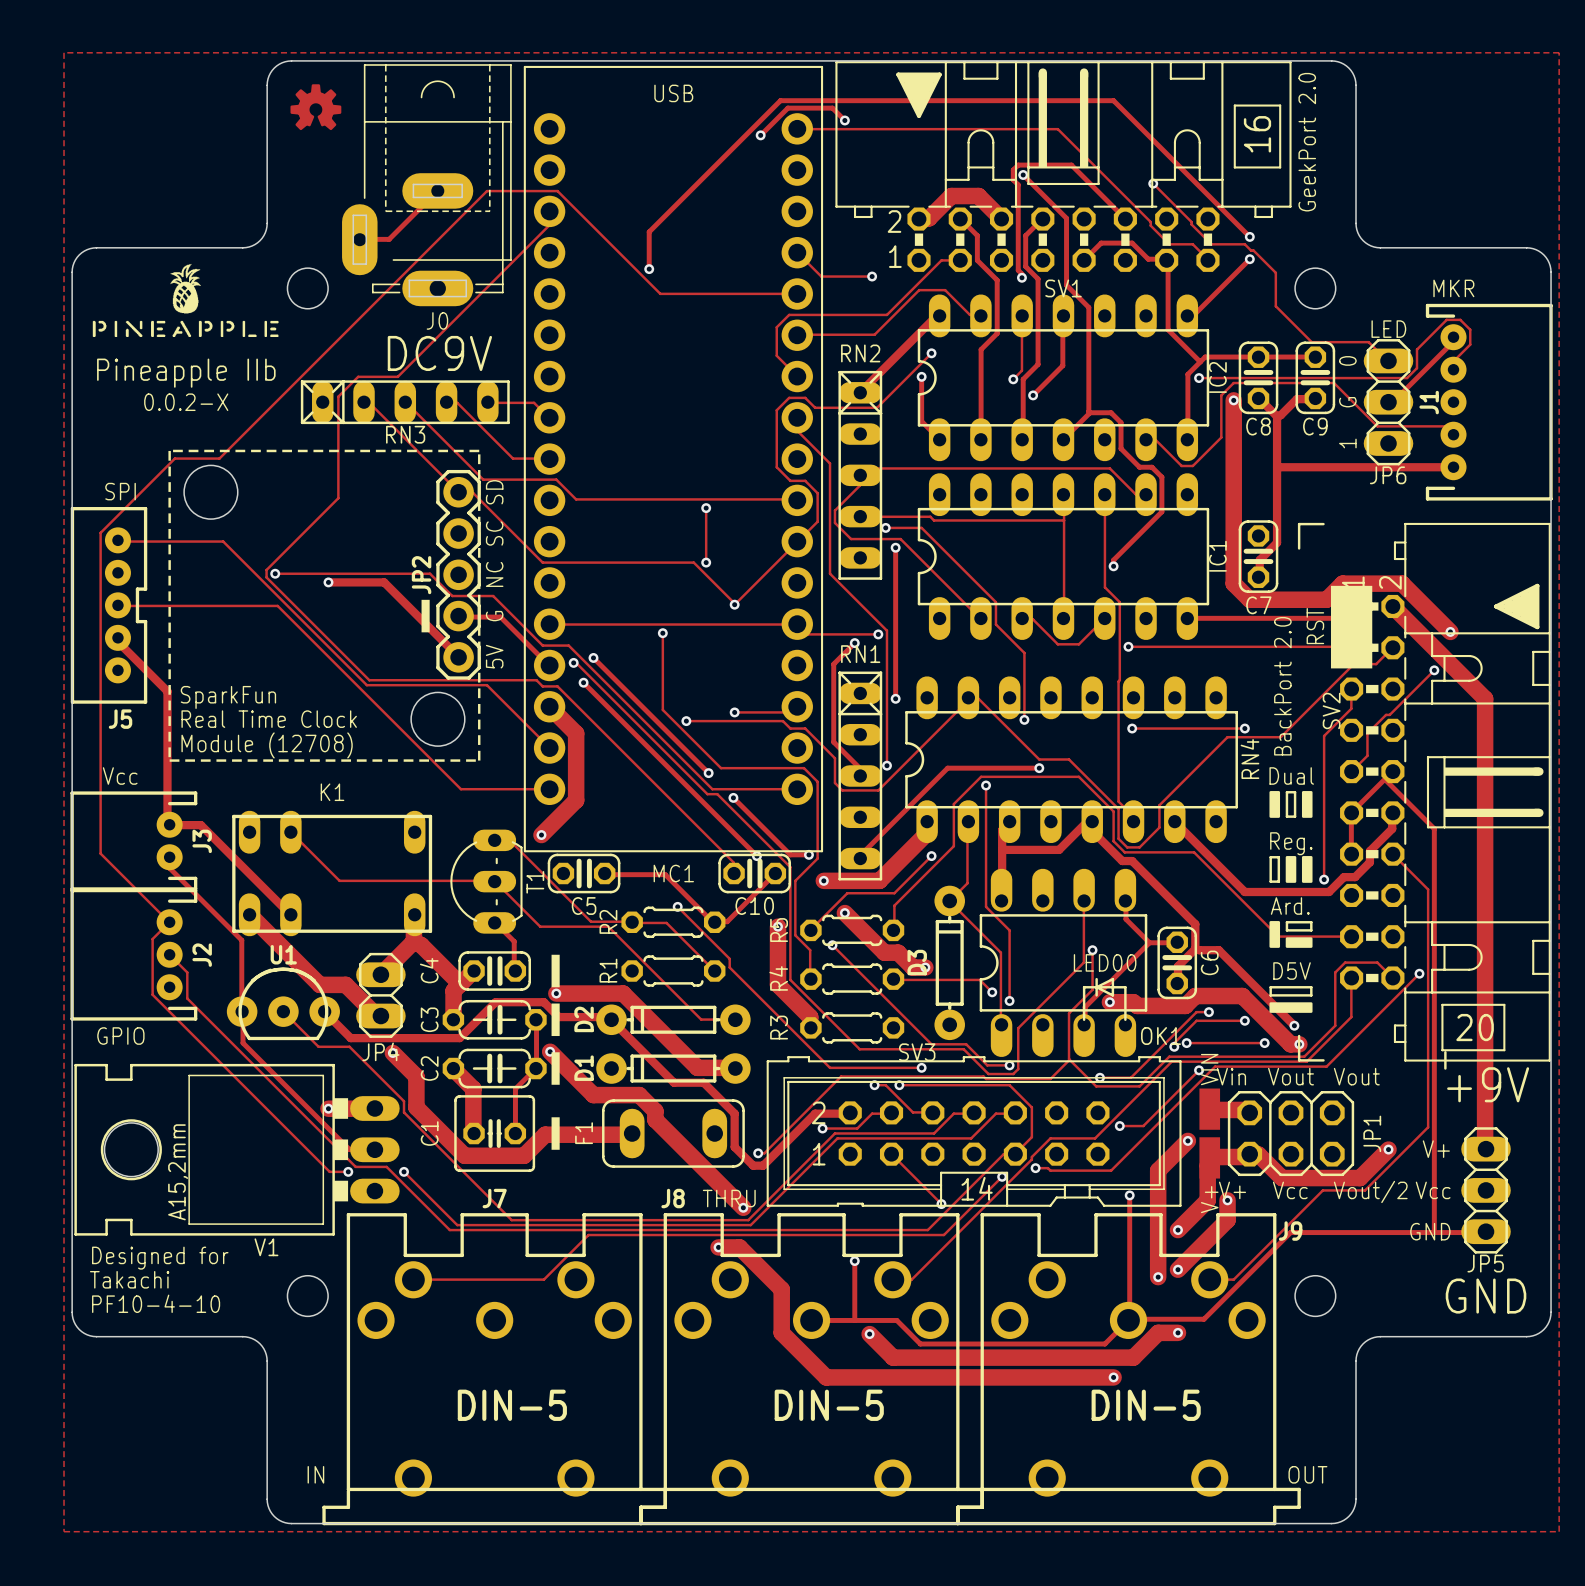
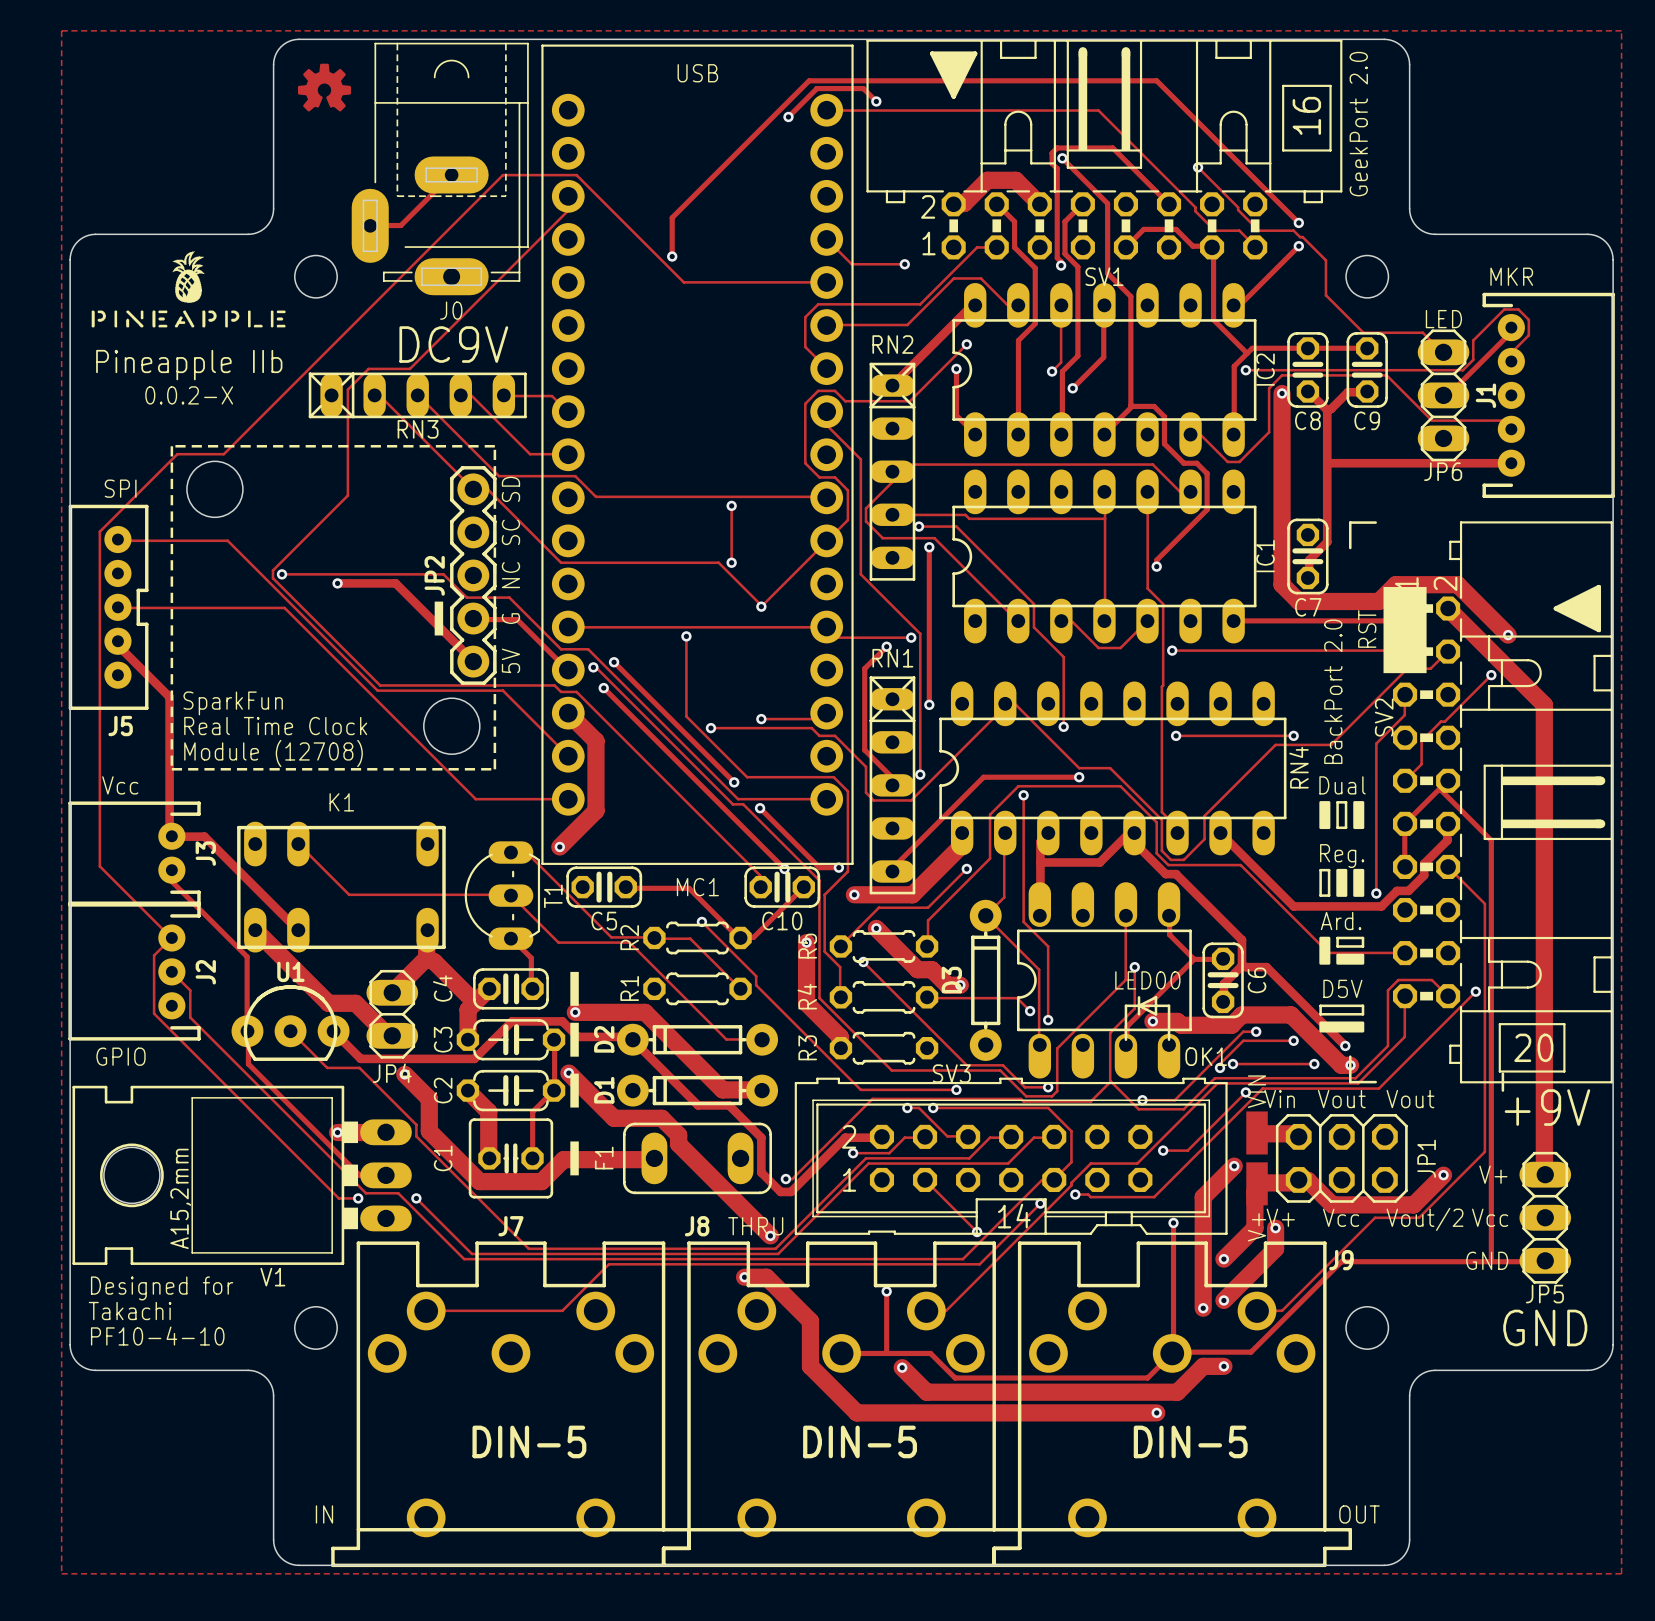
text: 0 (1347, 360) -> none
text: G (1347, 402) -> none
text: 1 (1347, 443) -> none

